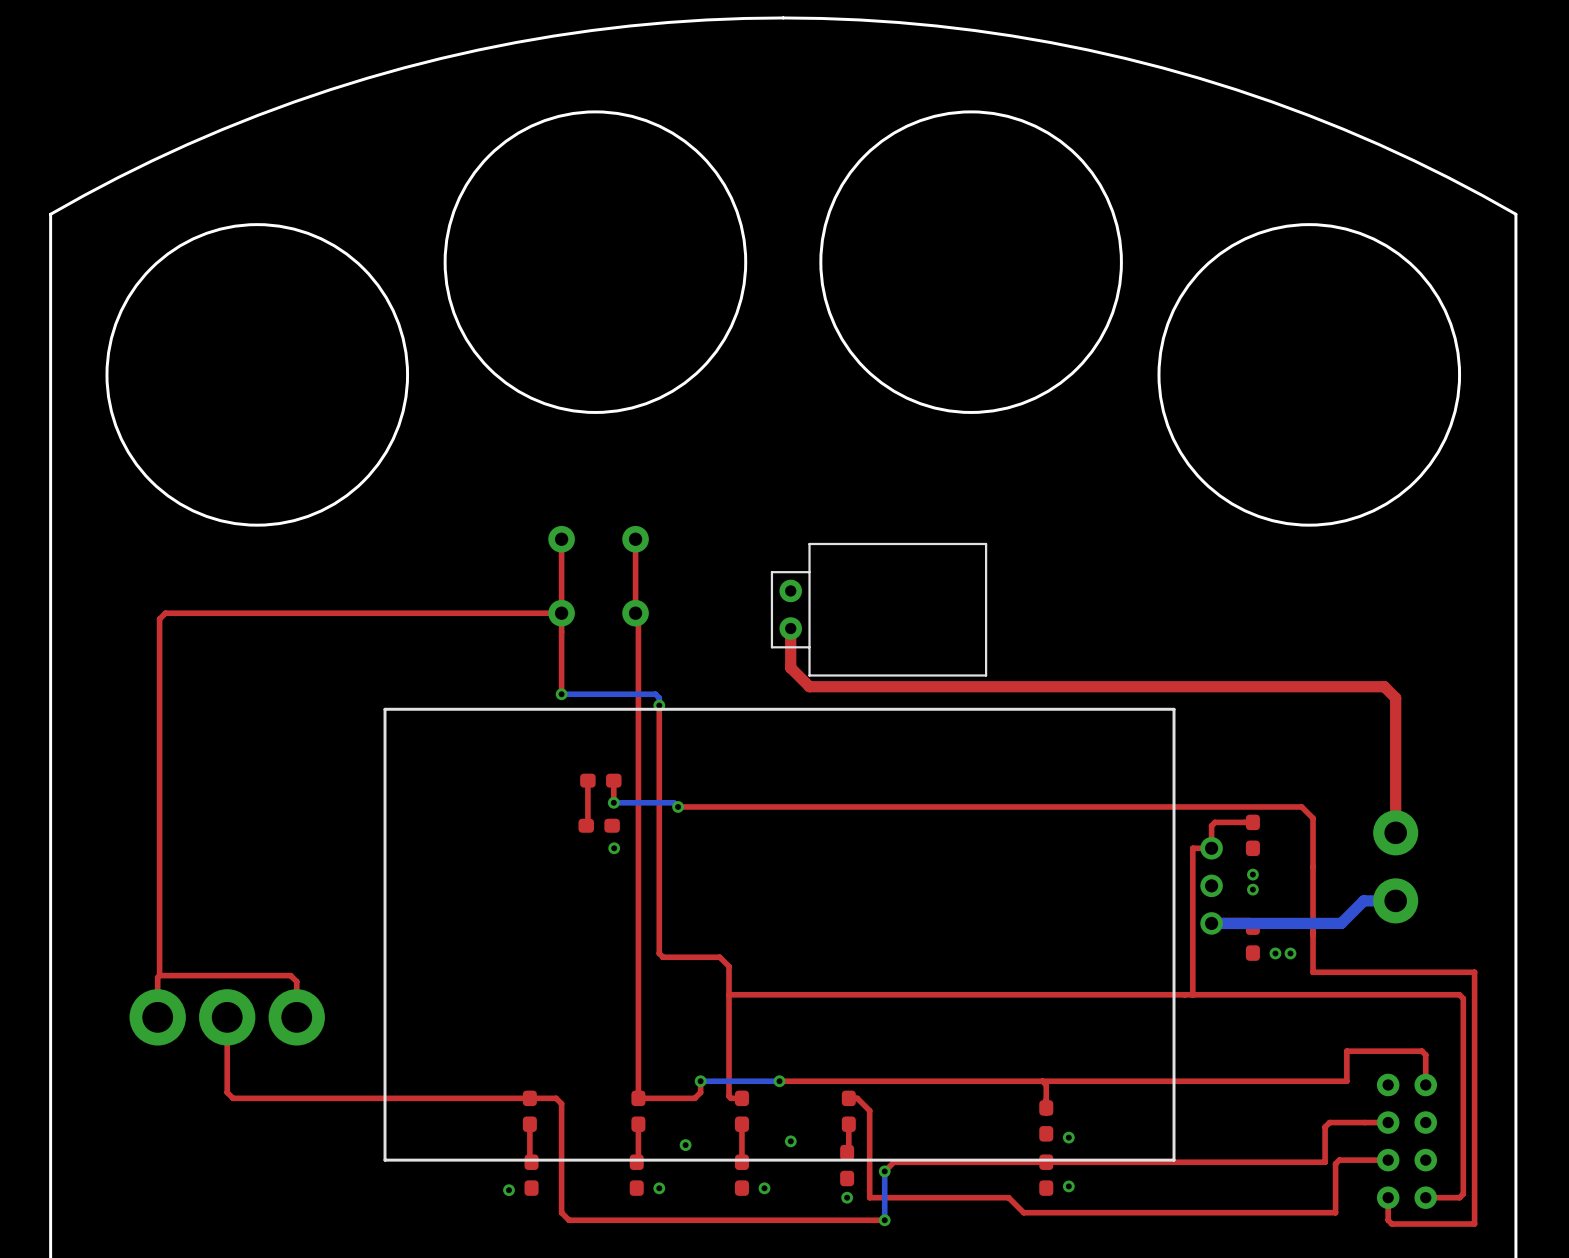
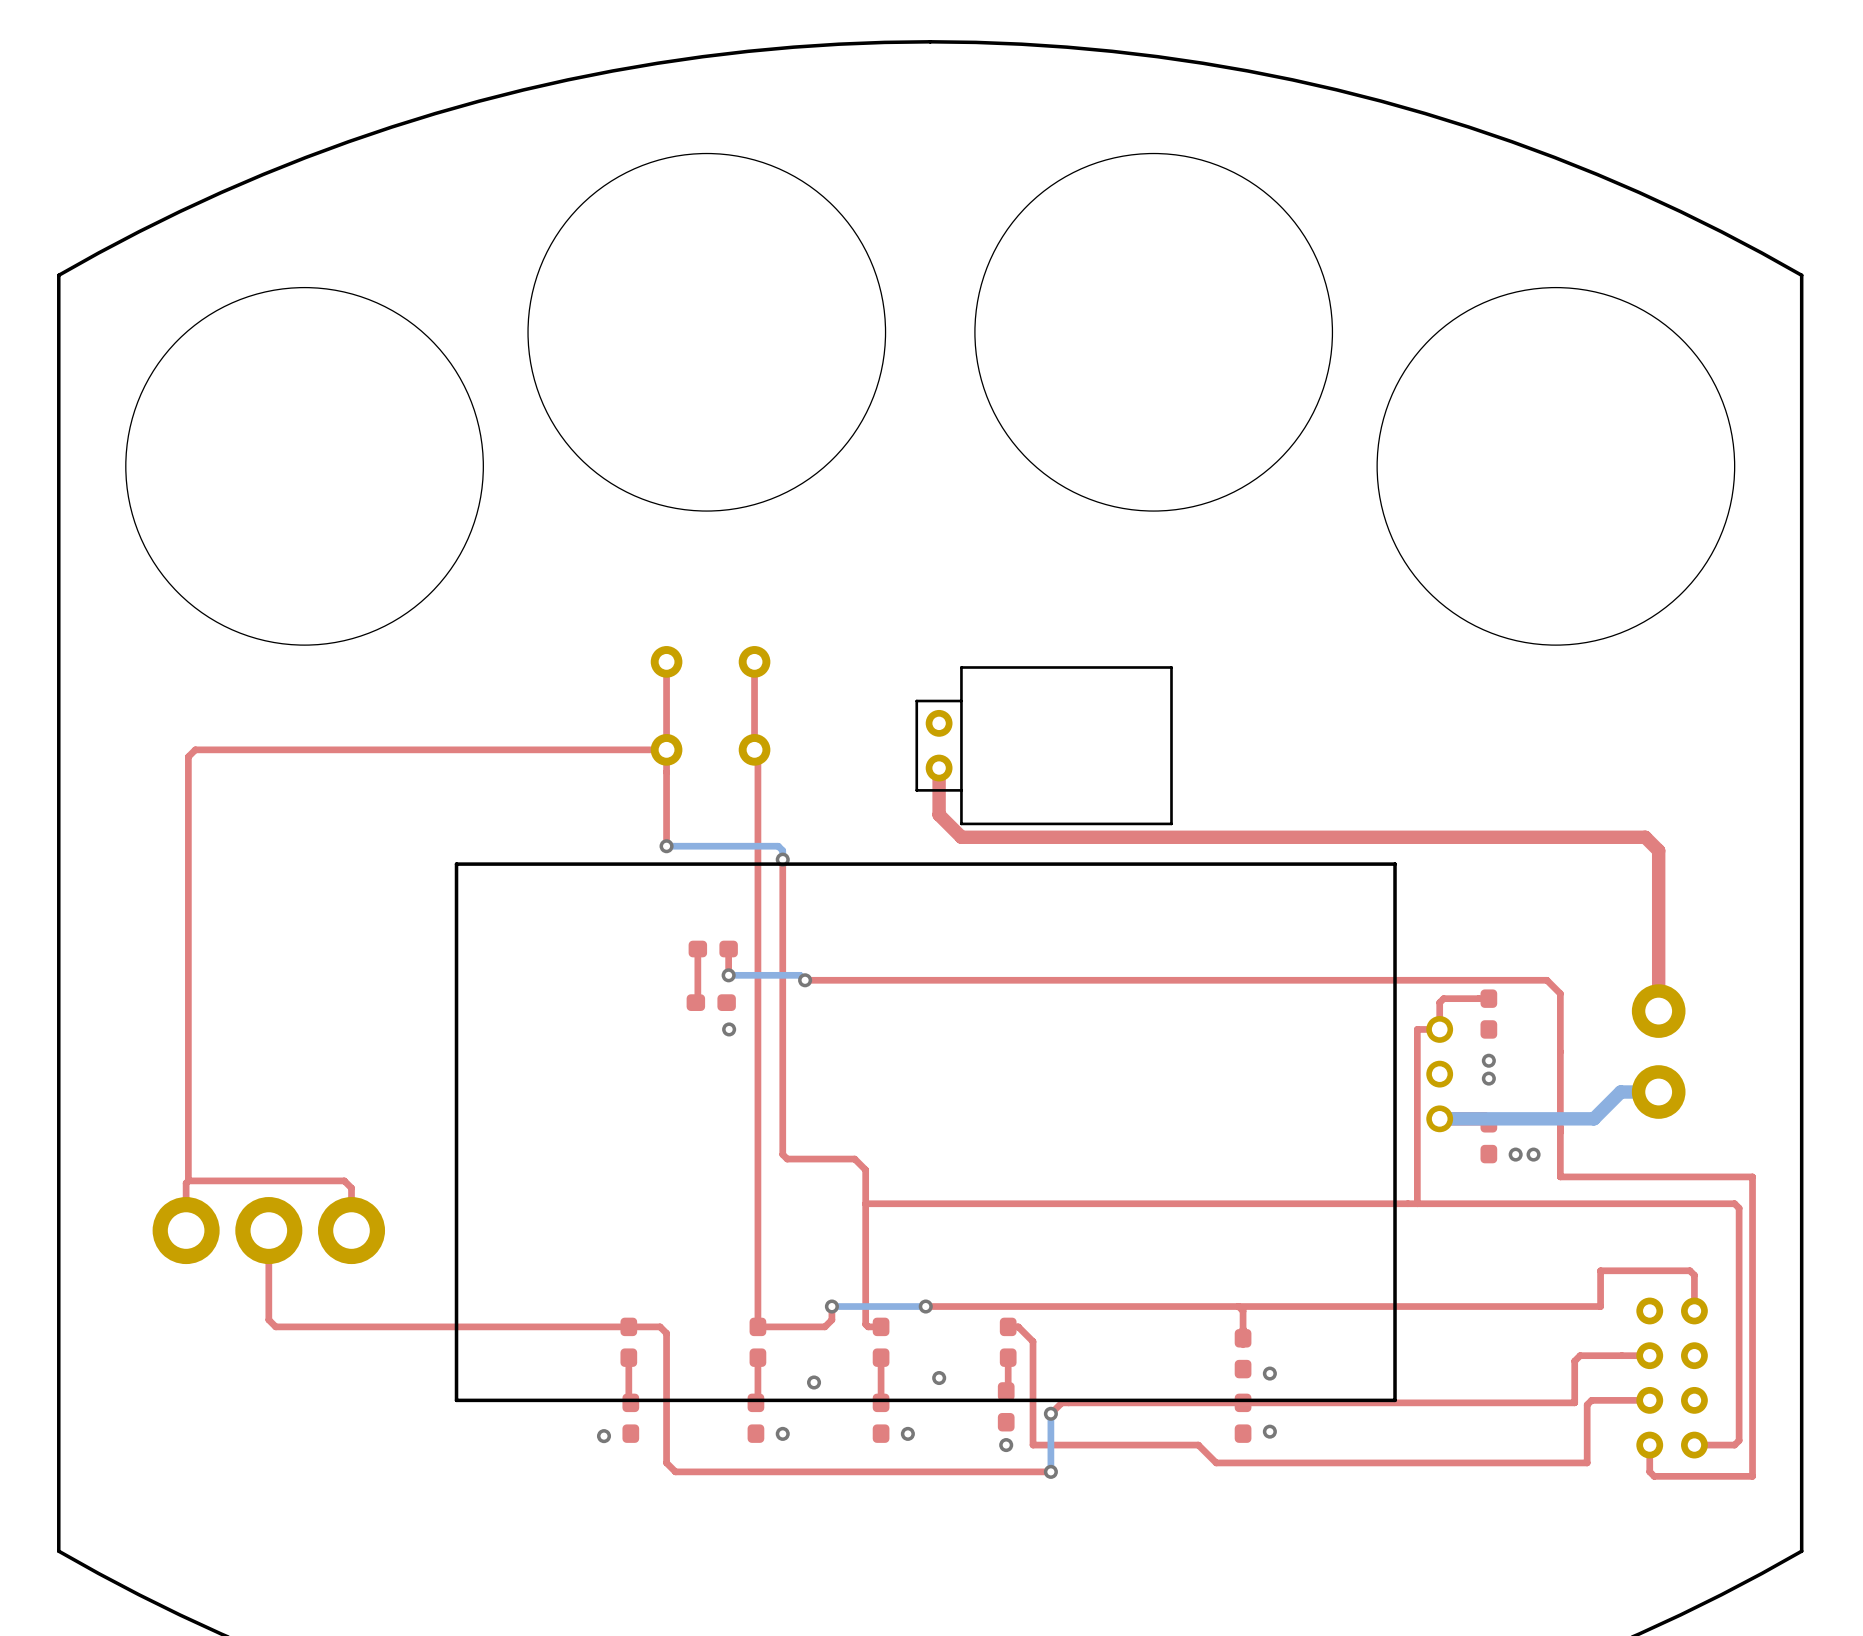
round board edge: [443, 110, 748, 414] -> none
round board edge: [819, 110, 1123, 414] -> none
round board edge: [105, 223, 410, 527] -> none
round board edge: [1157, 223, 1462, 527] -> none

